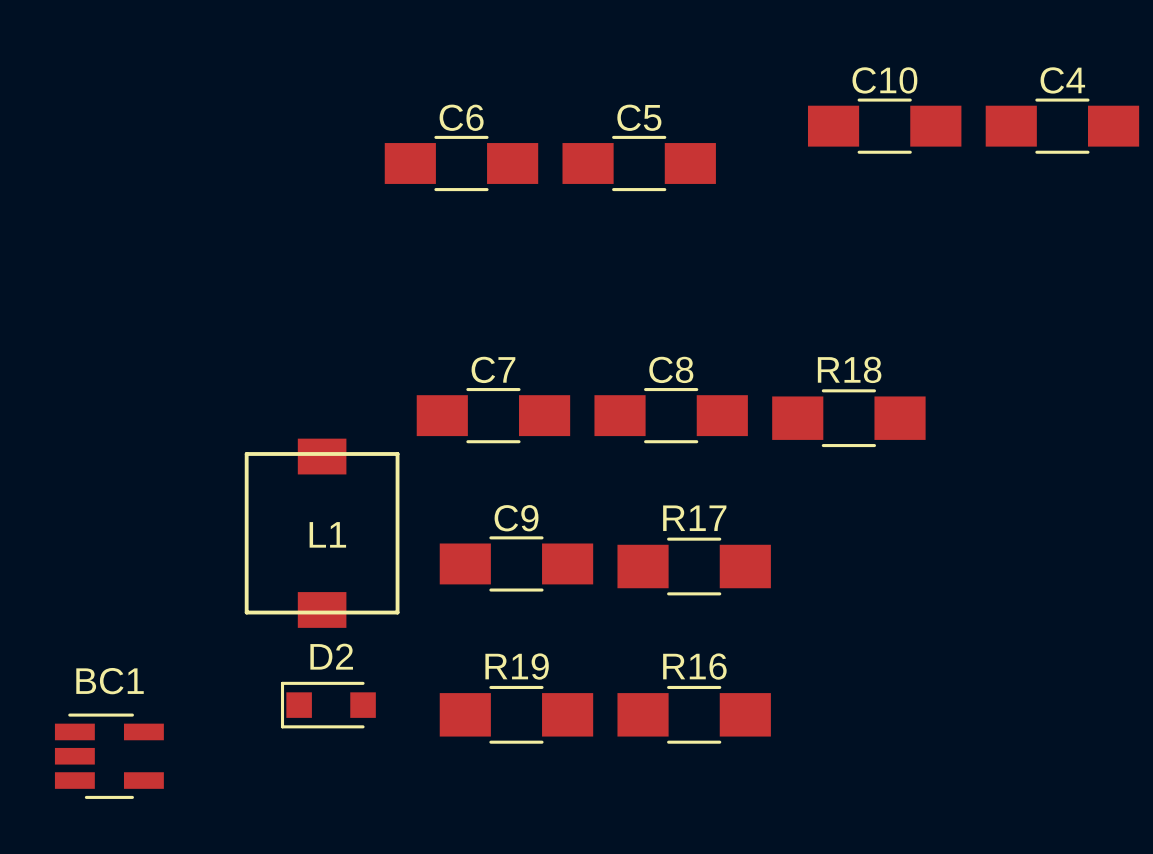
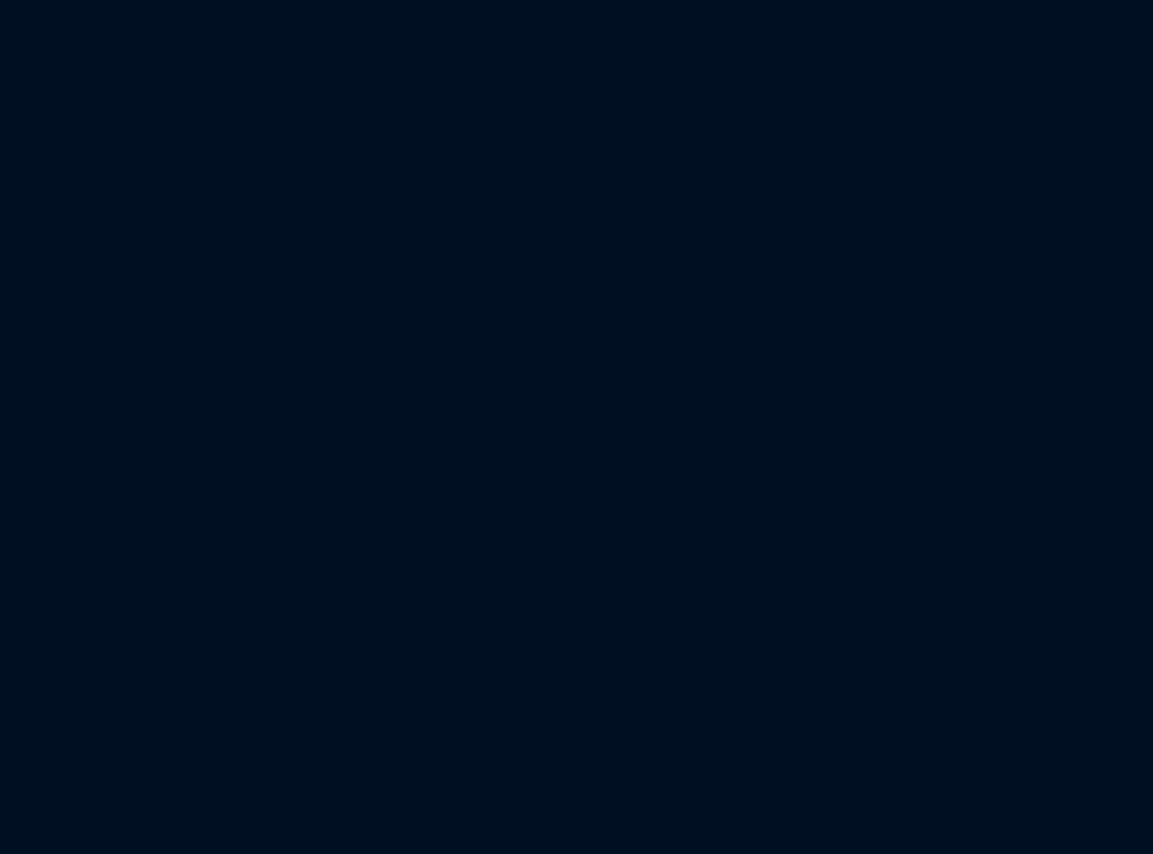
C10: (884, 126) -> none
C4: (1062, 126) -> none
C6: (461, 163) -> none
C5: (639, 163) -> none
C7: (493, 415) -> none
C8: (671, 415) -> none
R18: (848, 418) -> none
L1: (322, 533) -> none
C9: (516, 563) -> none
R17: (694, 566) -> none
D2: (328, 705) -> none
R19: (516, 714) -> none
R16: (694, 714) -> none
BC1: (109, 756) -> none

